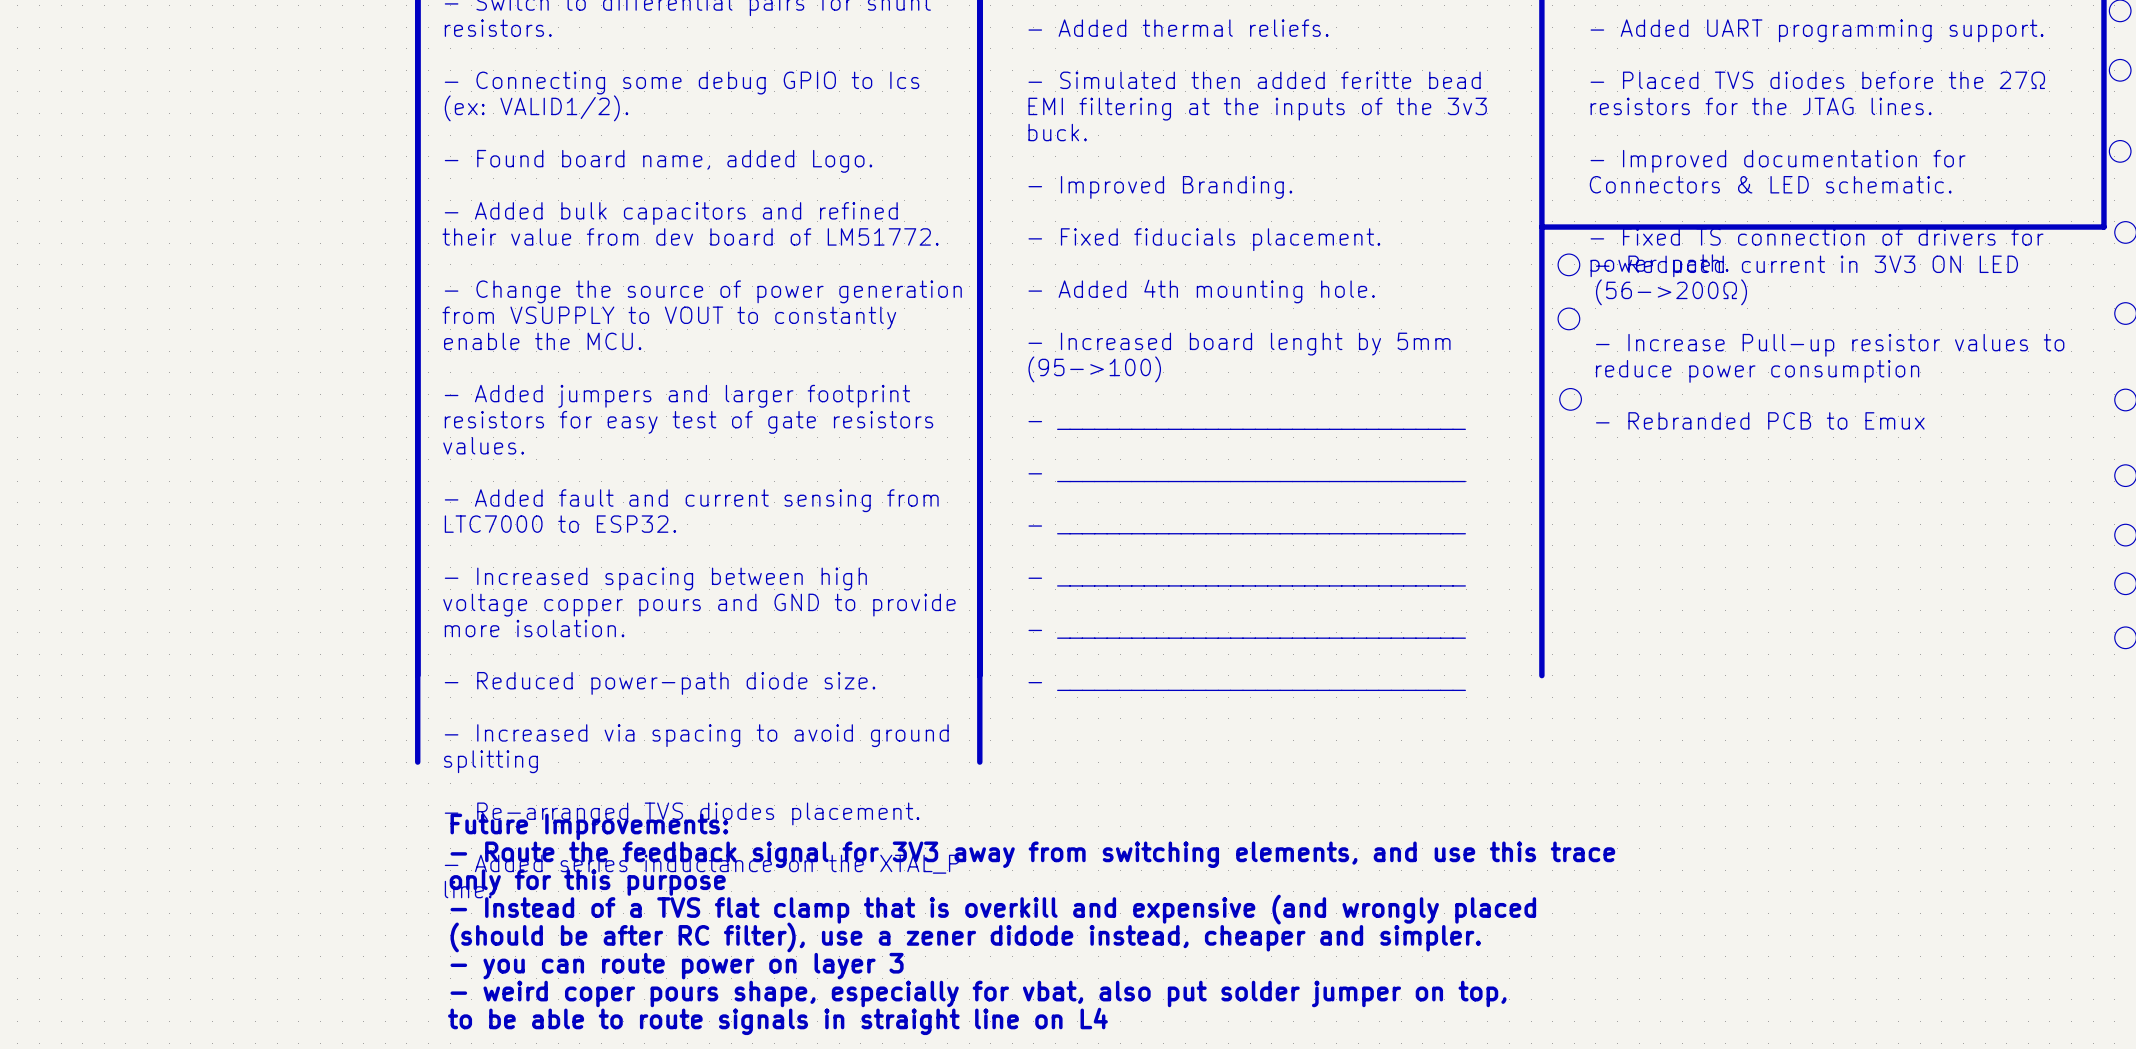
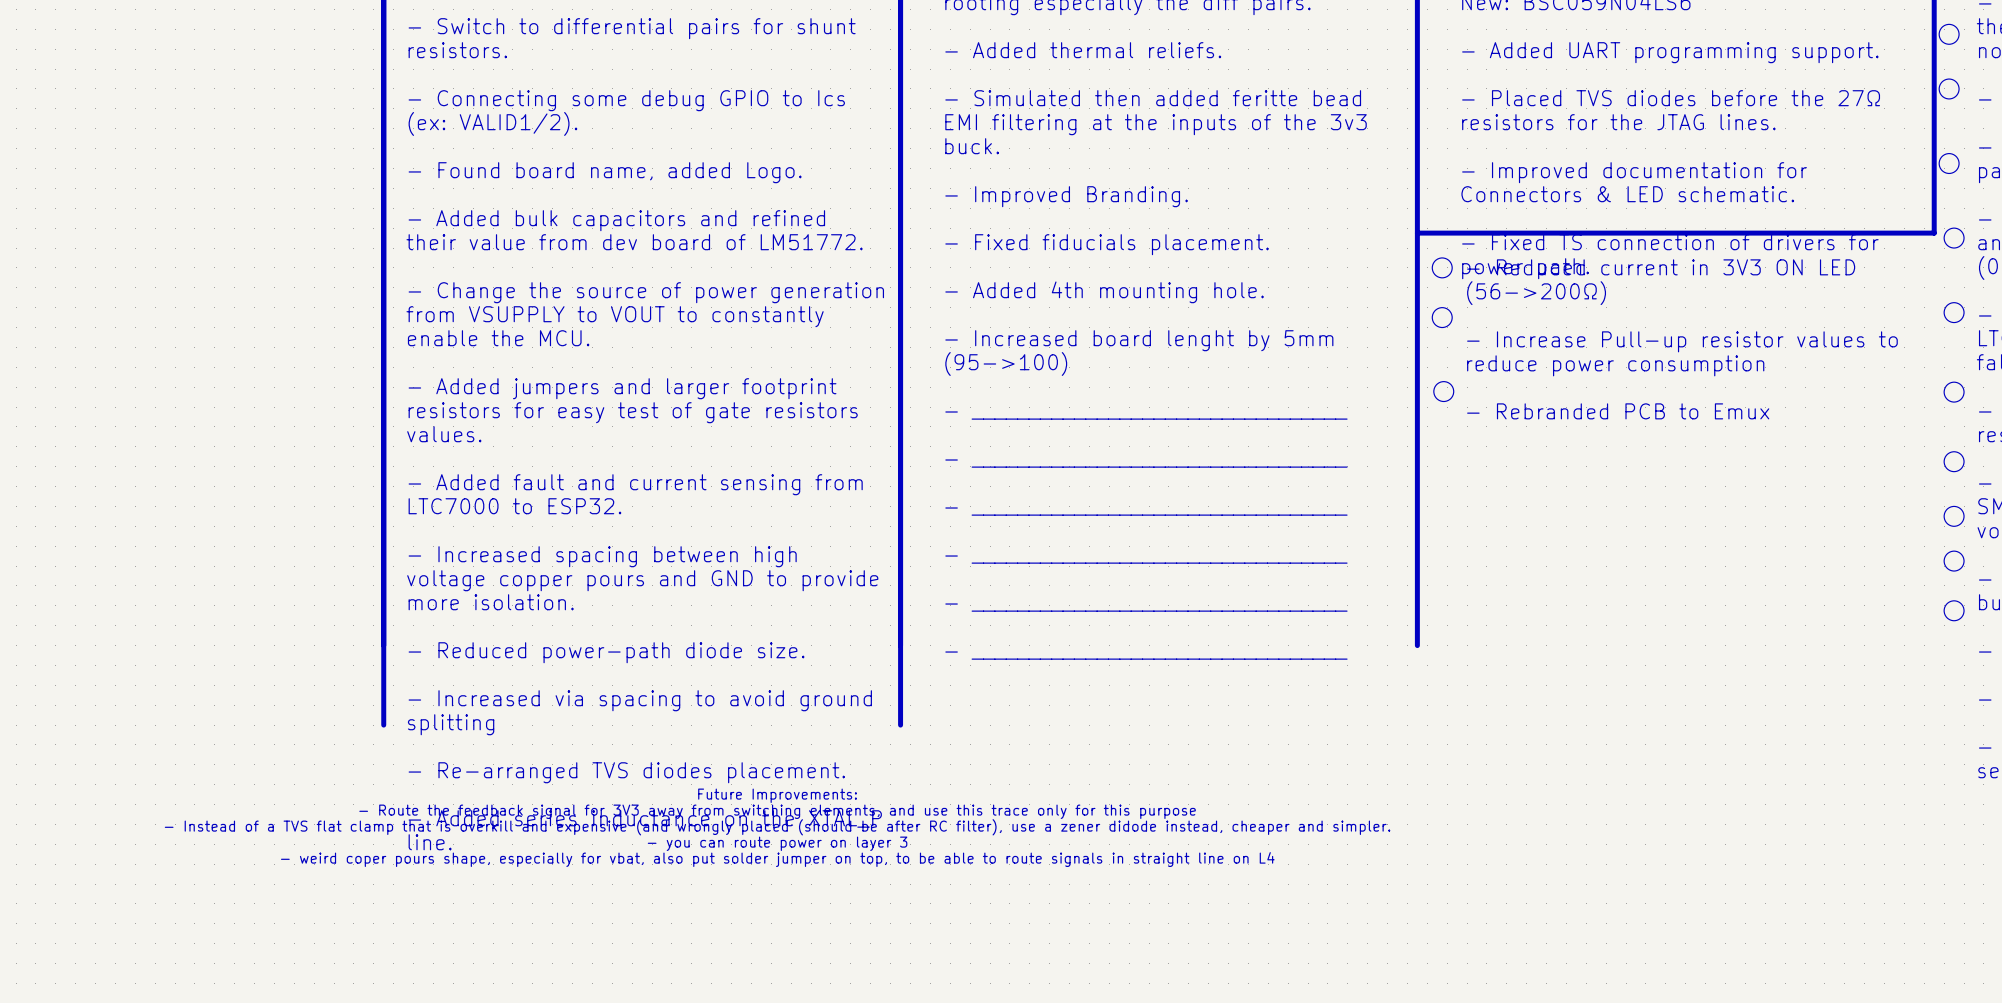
text: Future Improvements: (589, 826) -> none
text: none -> Future Improvements: (777, 795)
text: - Route the feedback signal for 3V3 away from switching elements, and use this trace (1032, 854) -> none
text: none -> - Route the feedback signal for 3V3 away from switching elements, and use this trace only for this purpose (777, 811)
text: none -> - Instead of a TVS flat clamp that is overkill and expensive (and wrongly placed (should be after RC filter), use a zener didode instead, cheaper and simpler. (777, 827)
text: only for this purpose (587, 882) -> none
text: none -> - you can route power on layer 3 (777, 843)
text: none -> - weird coper pours shape, especially for vbat, also put solder jumper on top, to be able to route signals in straight line on L4 (777, 859)
text: - Instead of a TVS flat clamp that is overkill and expensive (and wrongly placed (993, 909) -> none
text: (should be after RC filter), use a zener didode instead, cheaper and simpler. (965, 937) -> none
text: - you can route power on layer 3 (677, 966) -> none
text: - weird coper pours shape, especially for vbat, also put solder jumper on top, (978, 993) -> none
text: to be able to route signals in straight line on L4 (777, 1021) -> none

